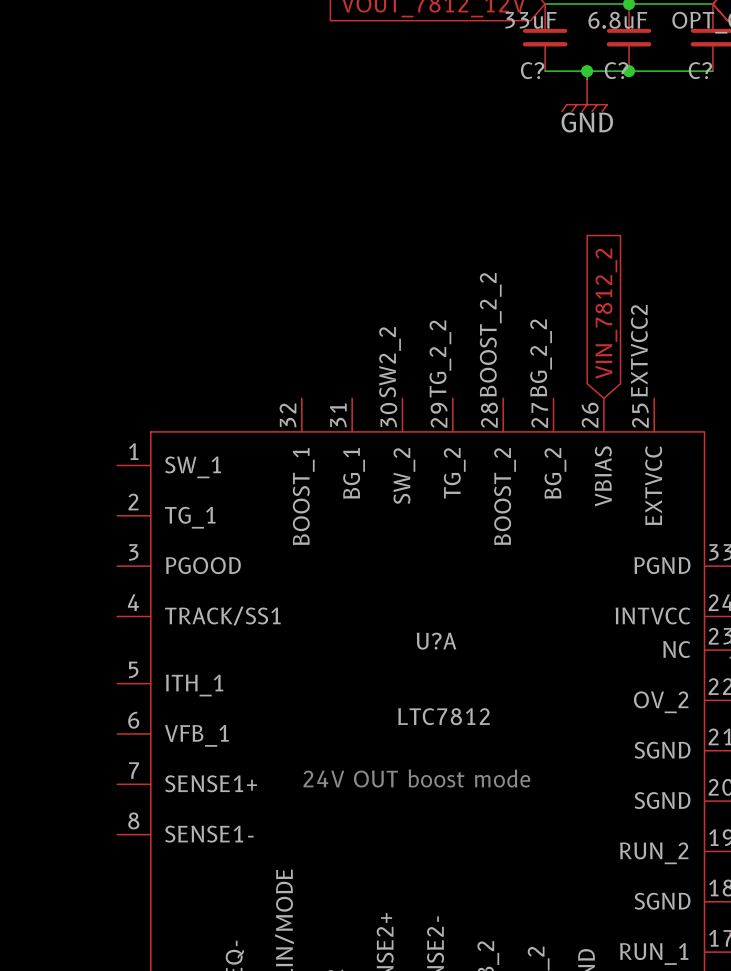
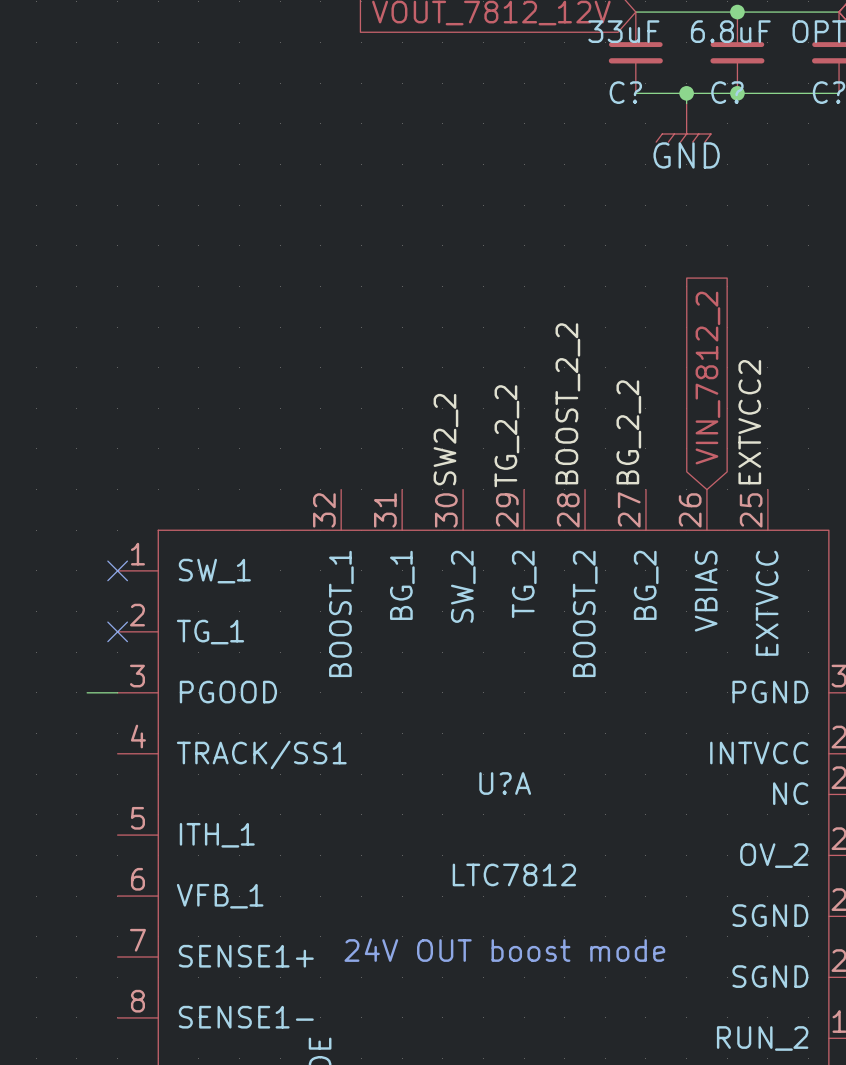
no-connect mark: none -> (117, 570)
no-connect mark: none -> (117, 631)
wire: none -> (87, 692) (117, 692)

